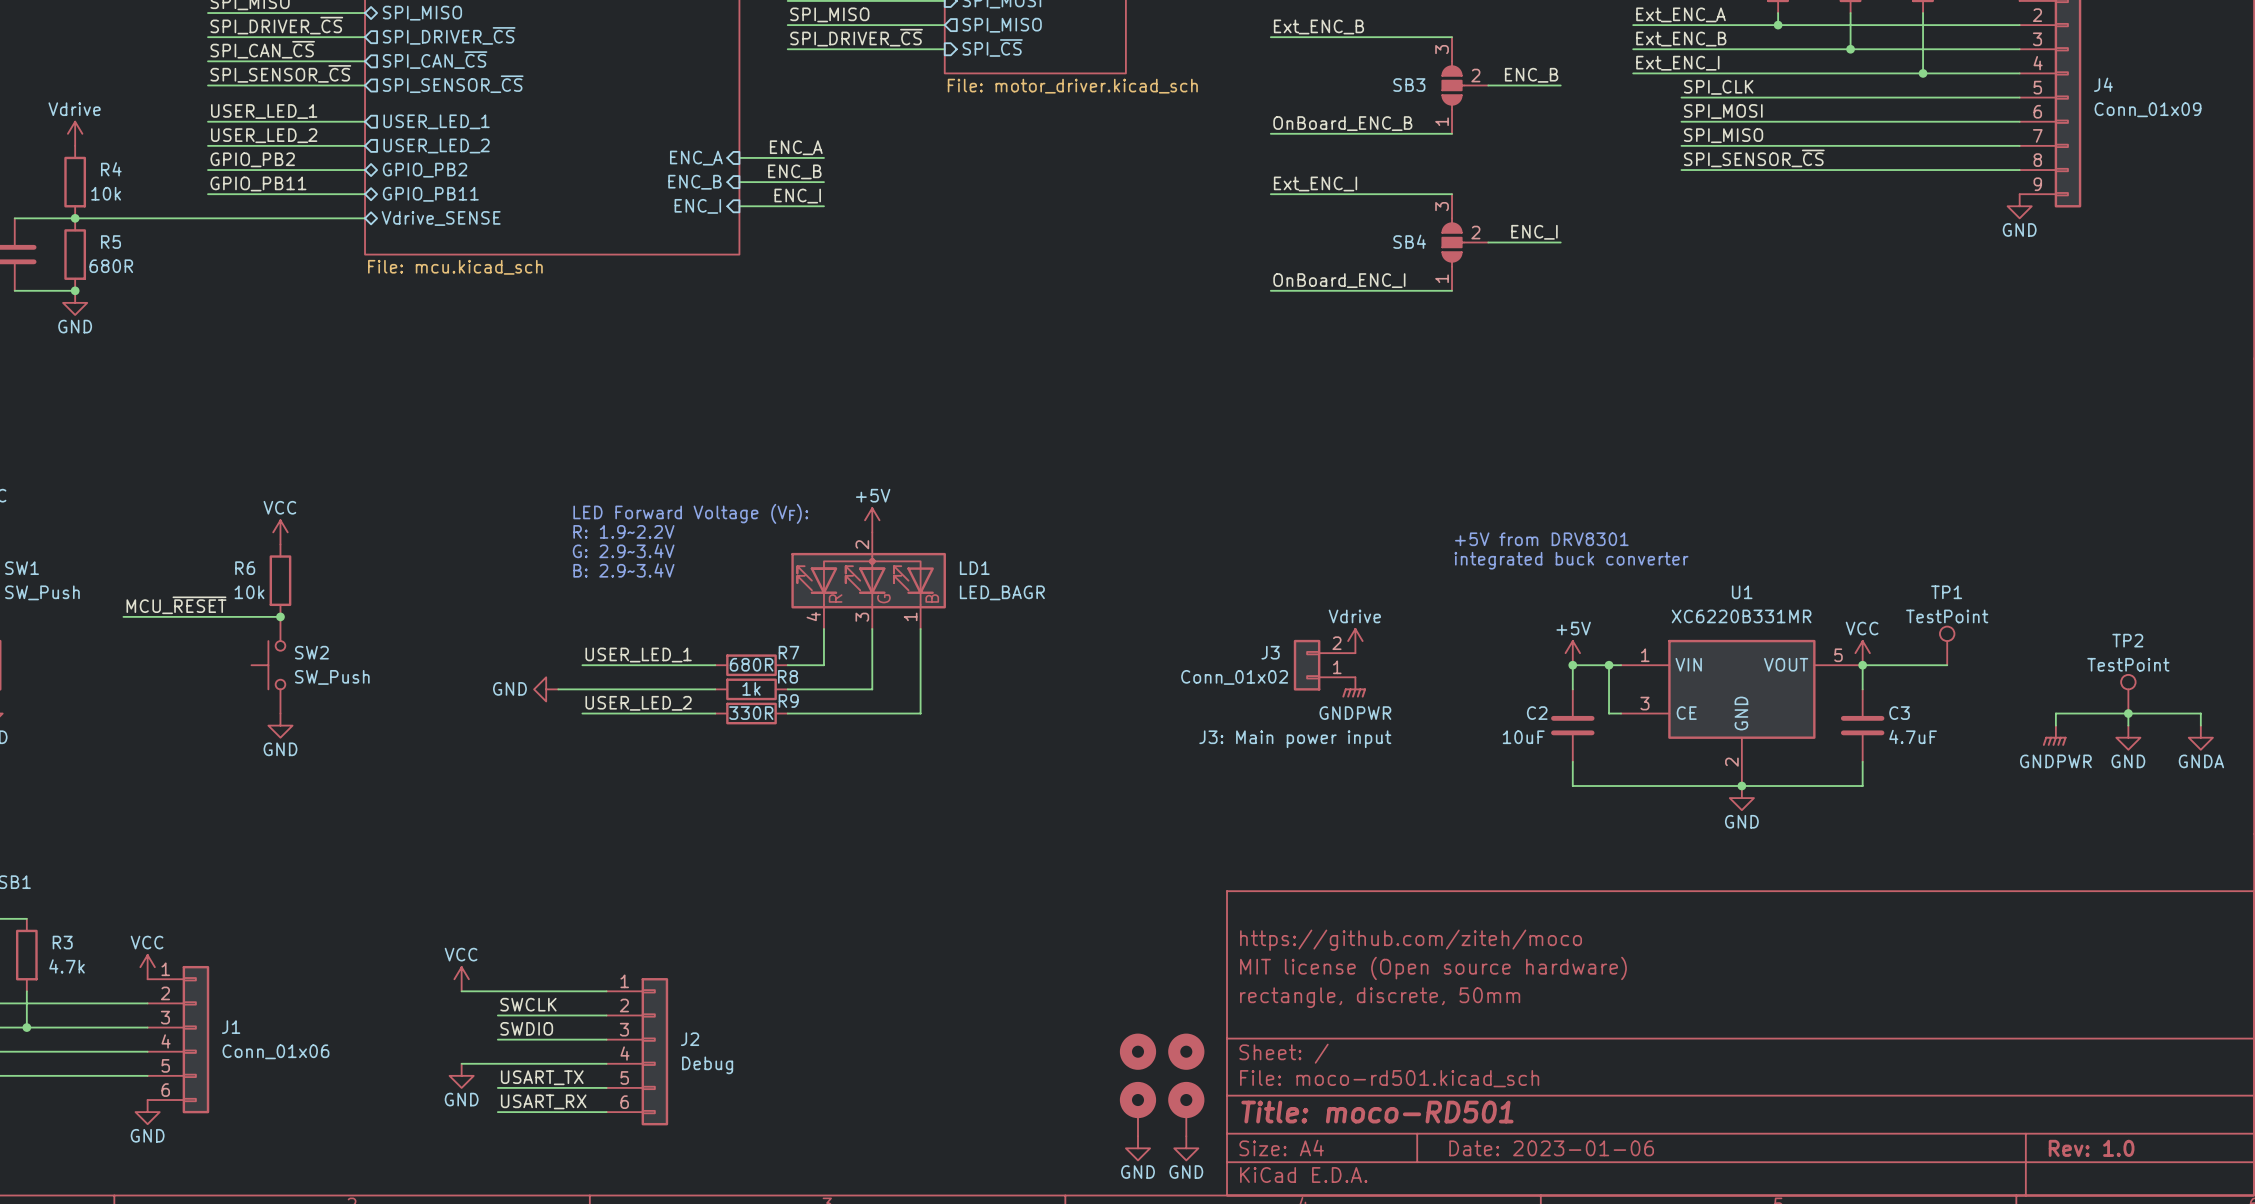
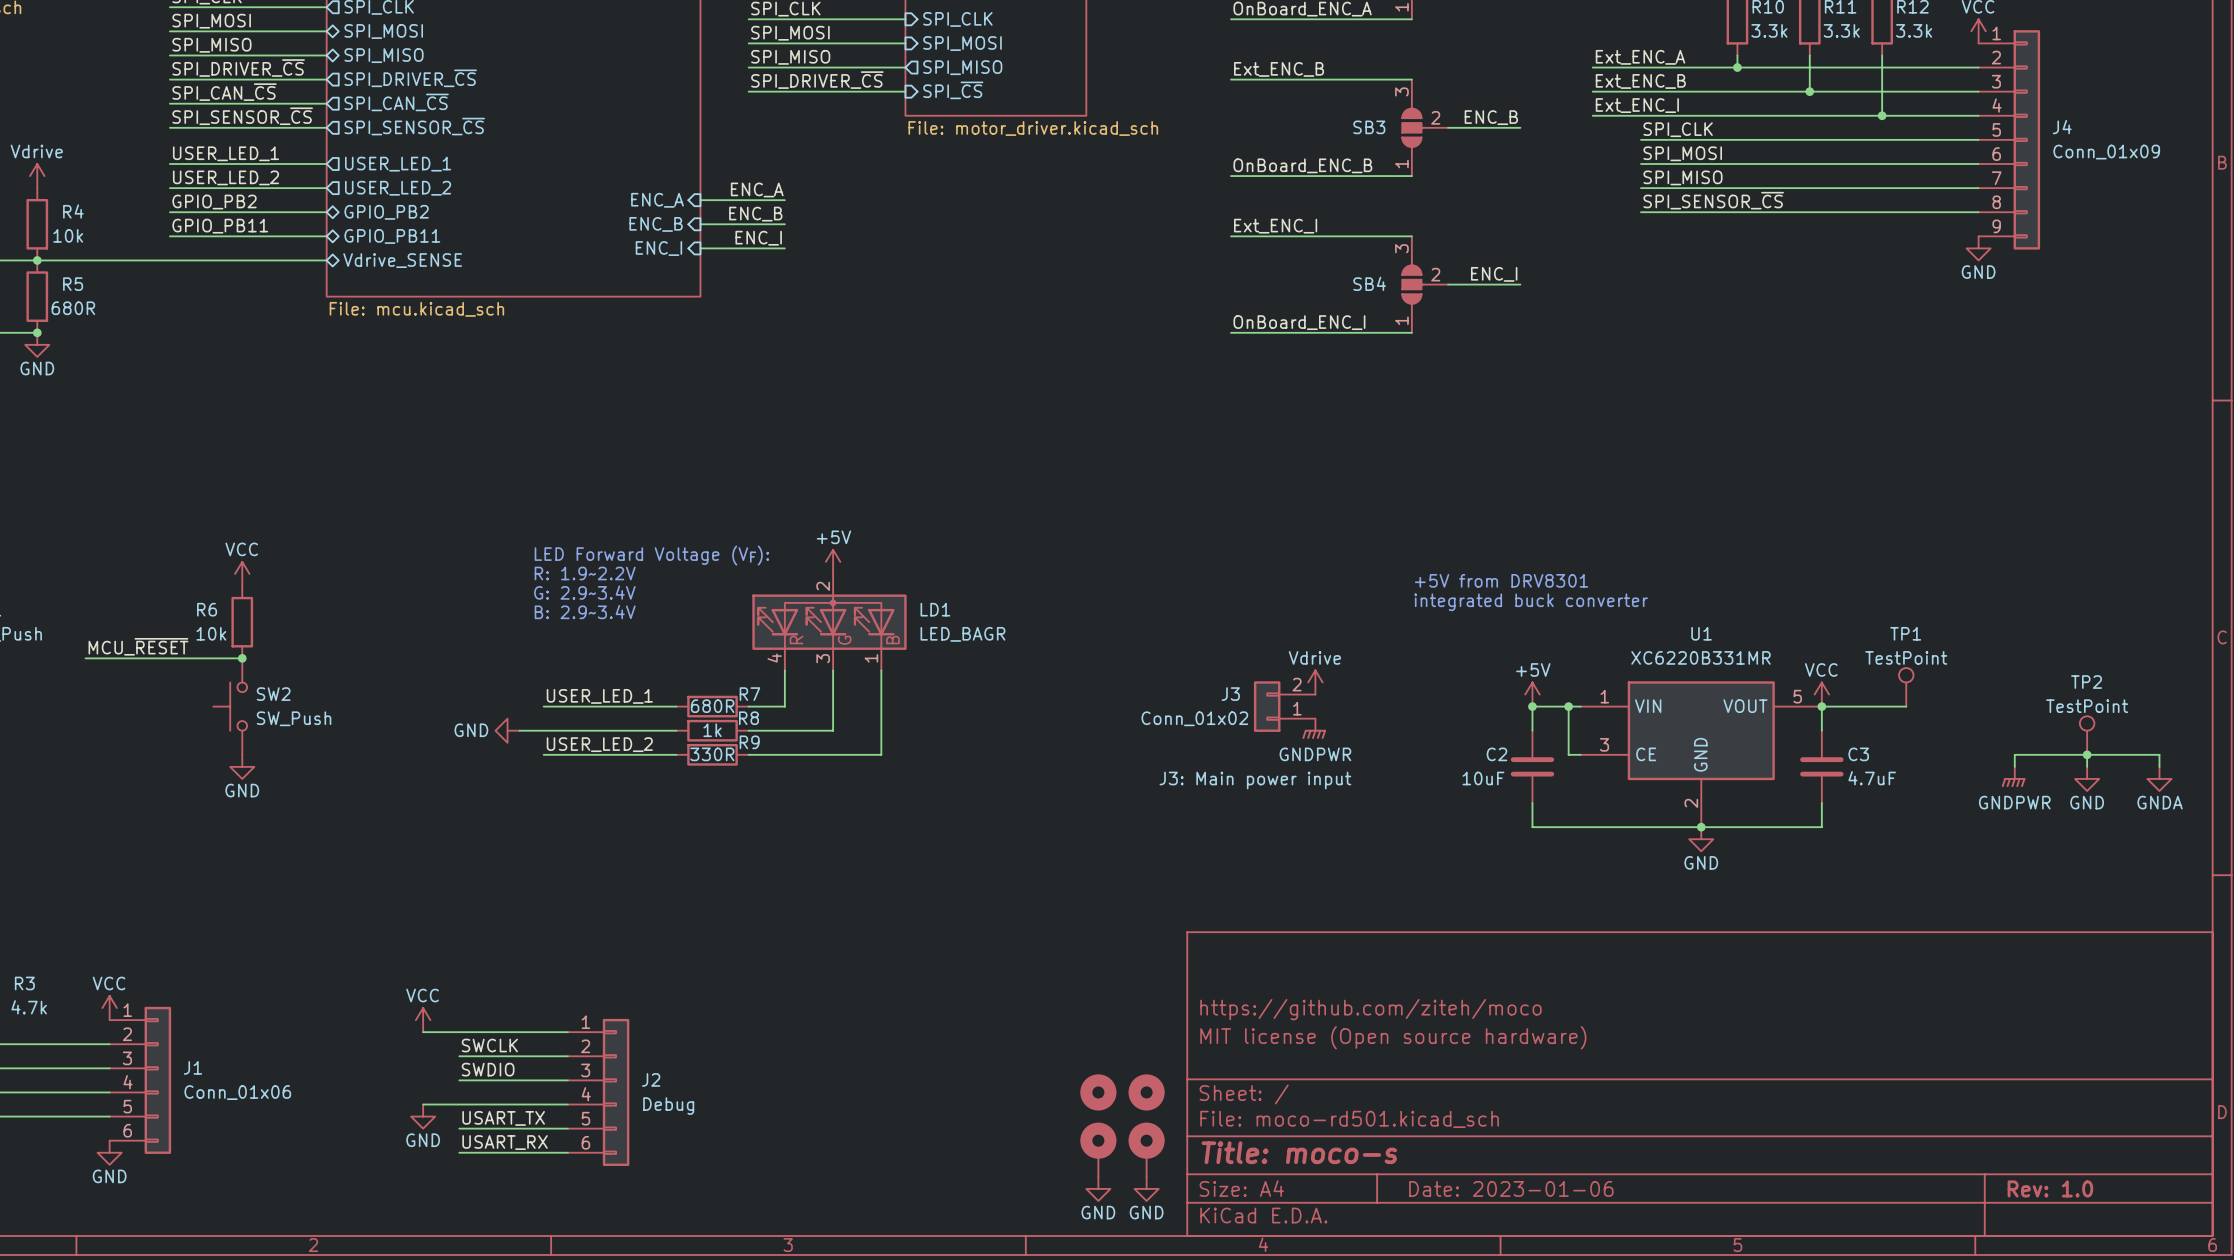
title block: https://github.com/ziteh/moco (1411, 940) -> none
title block: MIT license (Open source hardware) (1433, 968) -> https://github.com/ziteh/moco (1370, 1009)
title block: rectangle, discrete, 50mm (1380, 997) -> MIT license (Open source hardware) (1393, 1037)
title block: Title: moco-RD501 (1377, 1112) -> Title: moco-s (1299, 1152)

